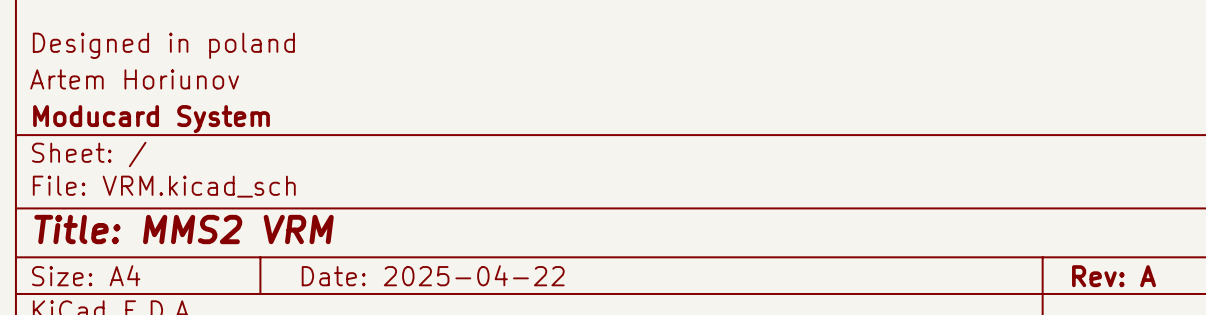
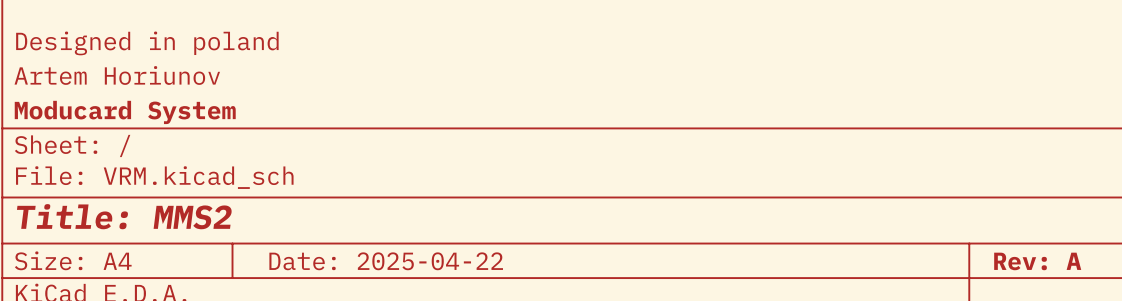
title block: Title: MMS2 VRM (184, 229) -> Title: MMS2 (124, 216)

